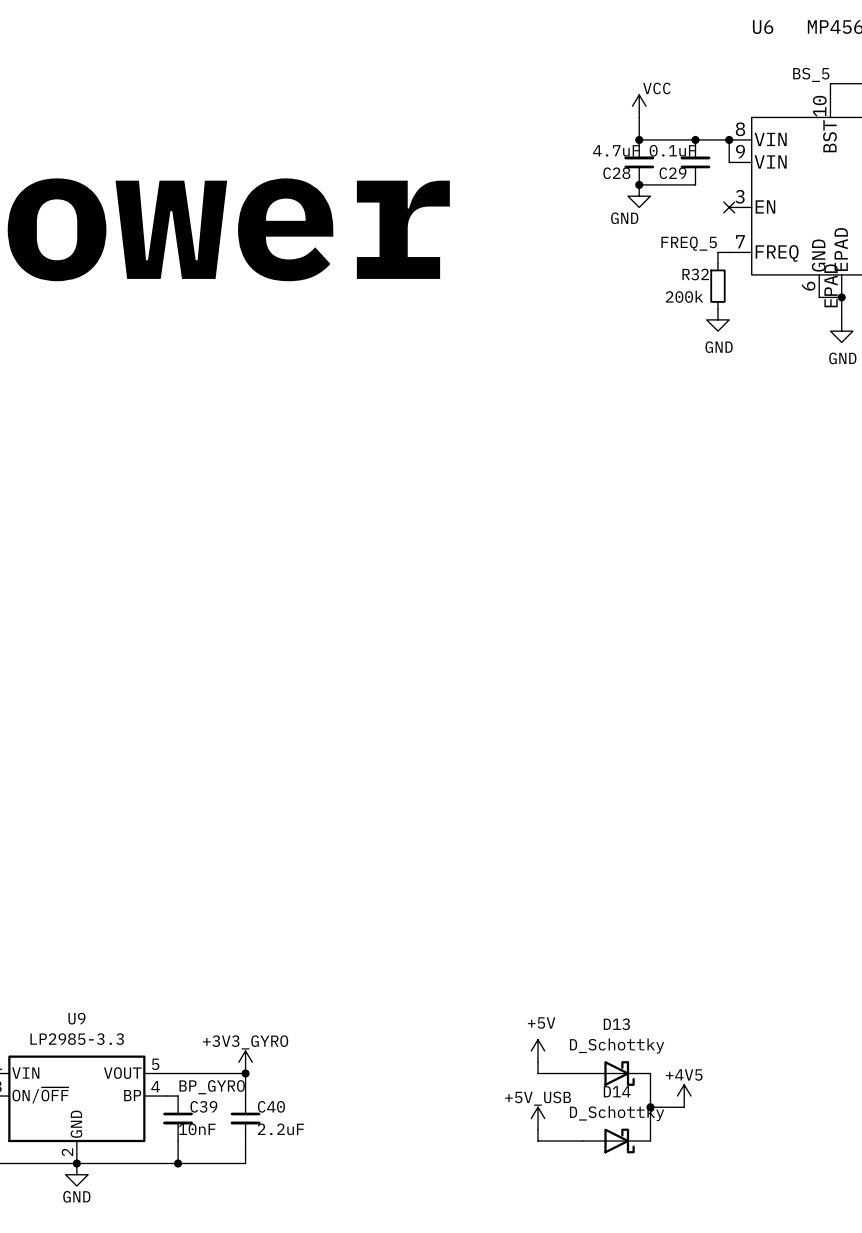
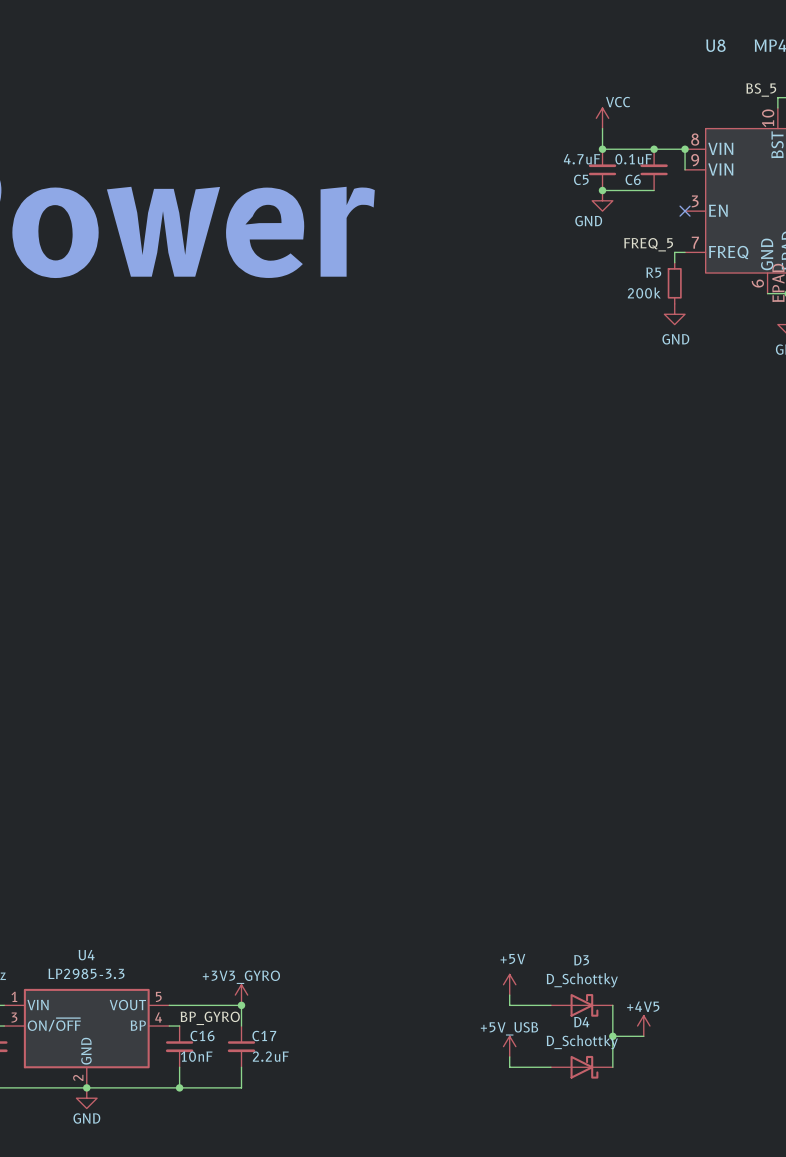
U6 name: U6 (763, 27) -> U8 (715, 45)
C28 name: C28 (616, 173) -> C5 (581, 179)
C29 name: C29 (673, 173) -> C6 (633, 179)
R32 name: R32 (695, 274) -> R5 (653, 272)
U9 name: U9 (76, 1018) -> U4 (86, 955)
D13 name: D13 (616, 1024) -> D3 (581, 960)
D14 name: D14 (617, 1091) -> D4 (581, 1022)
C39 name: C39 (203, 1106) -> C16 (202, 1035)
C40 name: C40 (271, 1106) -> C17 (264, 1035)

